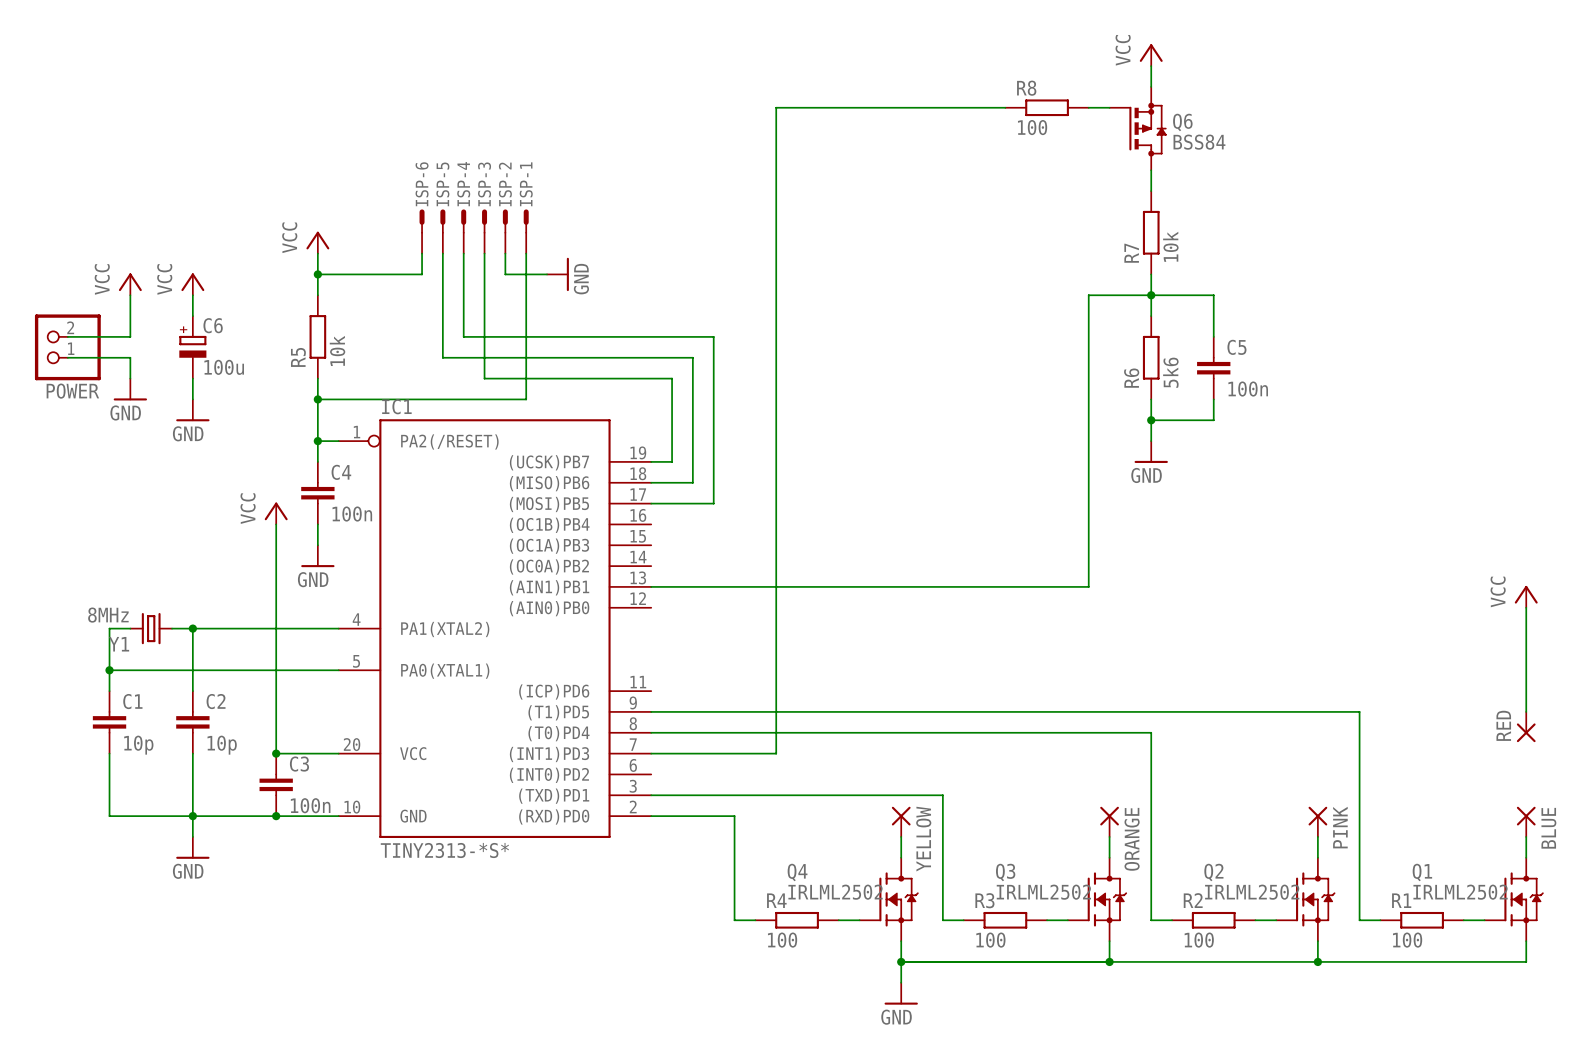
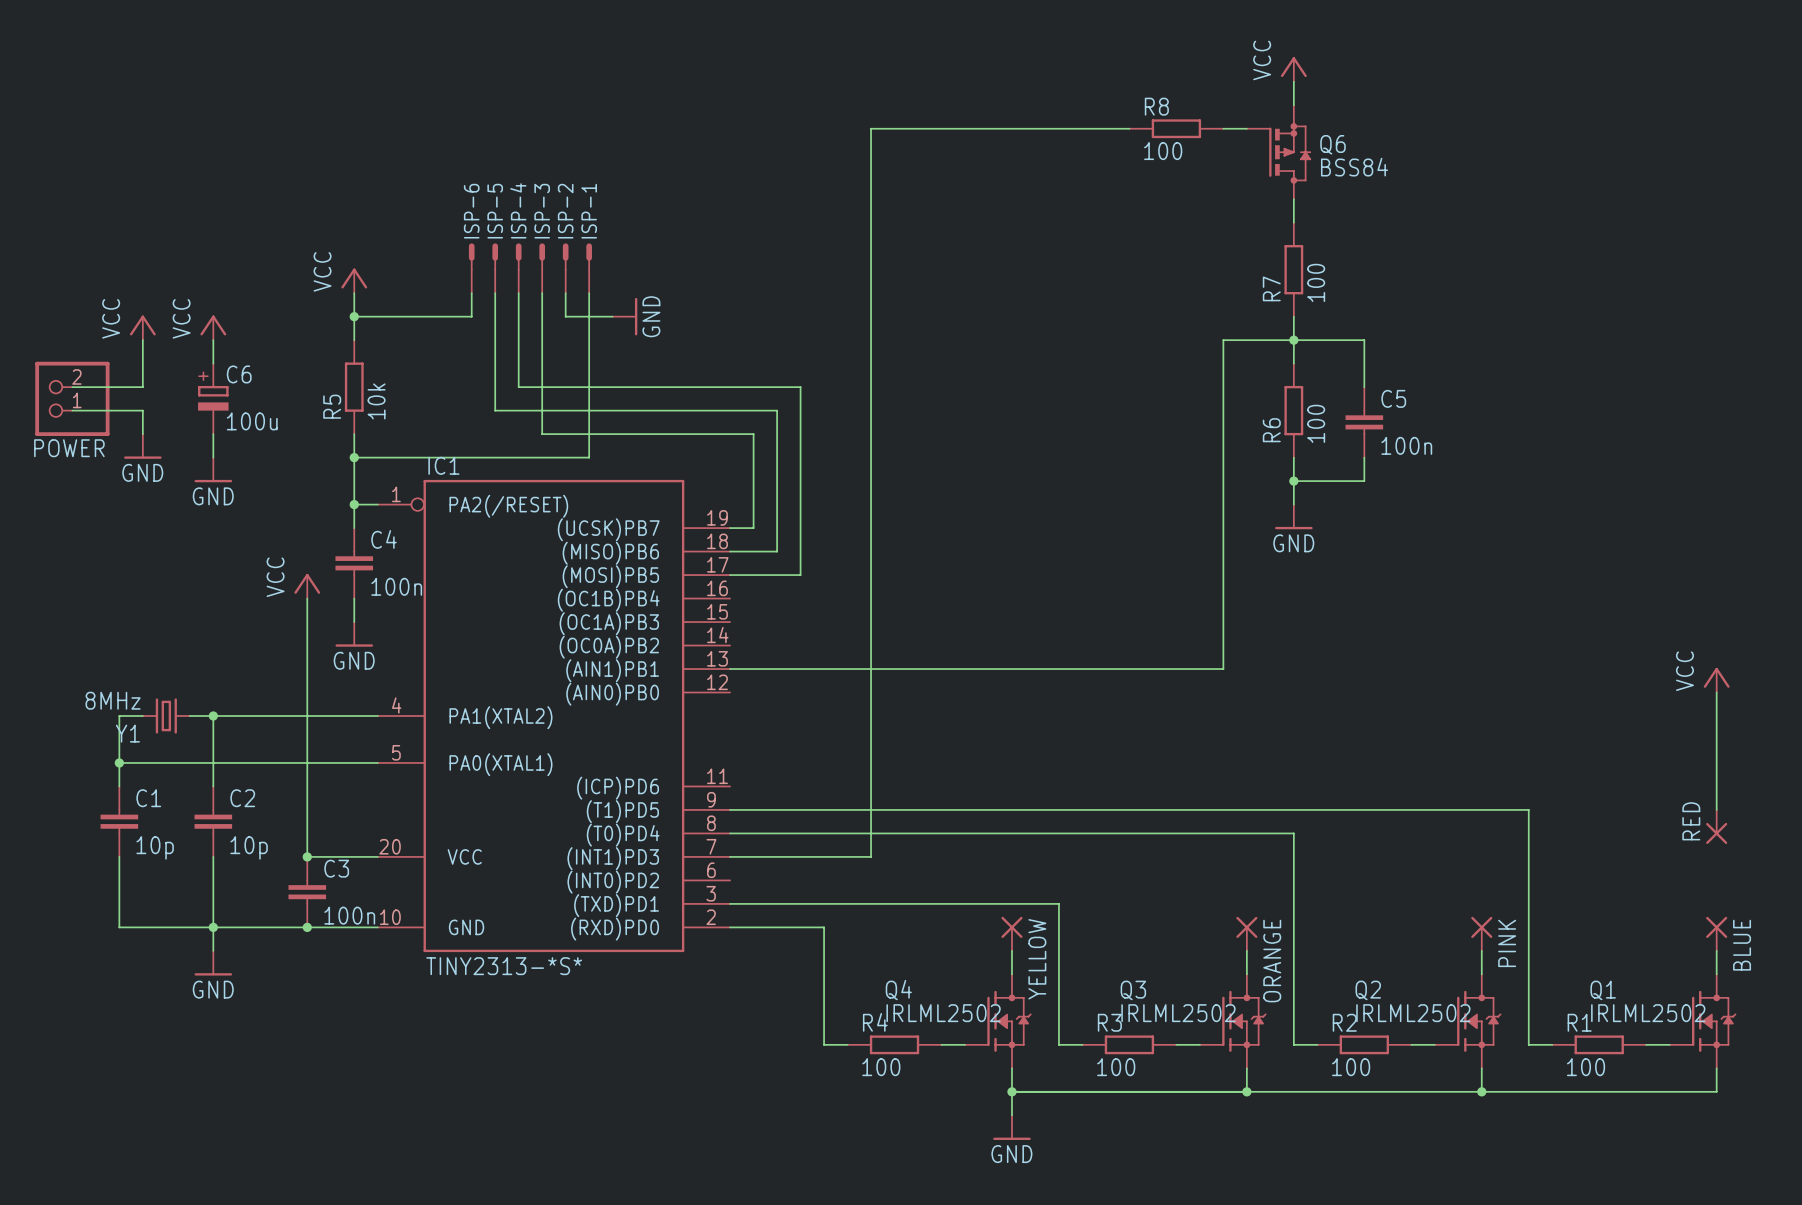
R7 value: 10k (1170, 246) -> 100 (1316, 282)
R6 value: 5k6 (1170, 372) -> 100 (1316, 423)

